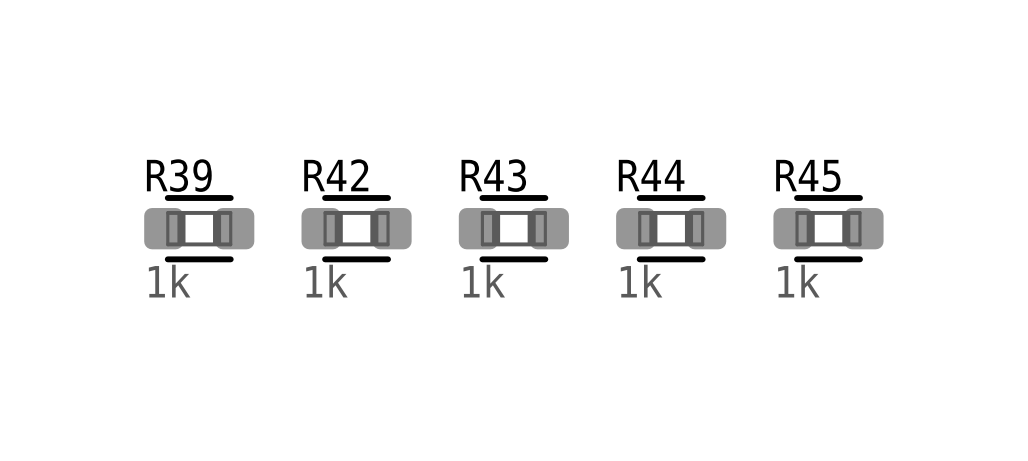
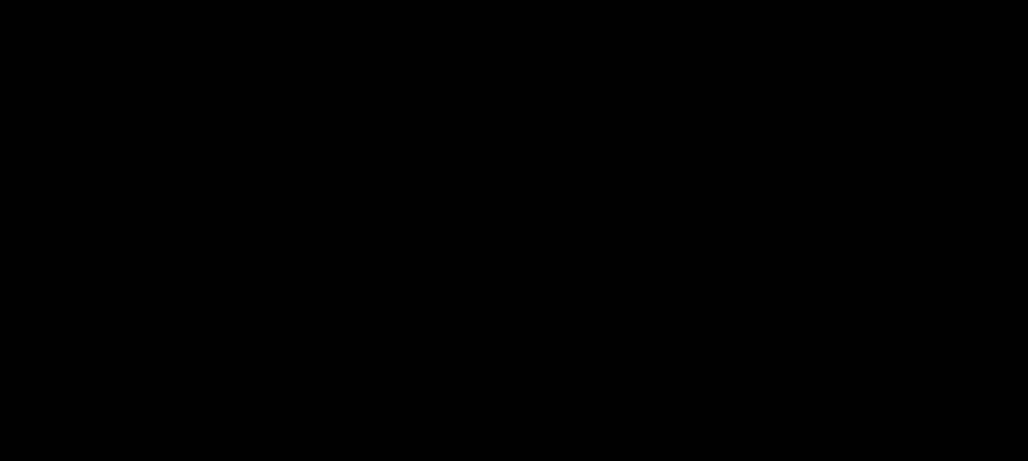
R39: 1k (199, 228) -> none
R42: 1k (356, 228) -> none
R43: 1k (513, 228) -> none
R44: 1k (671, 228) -> none
R45: 1k (828, 228) -> none

